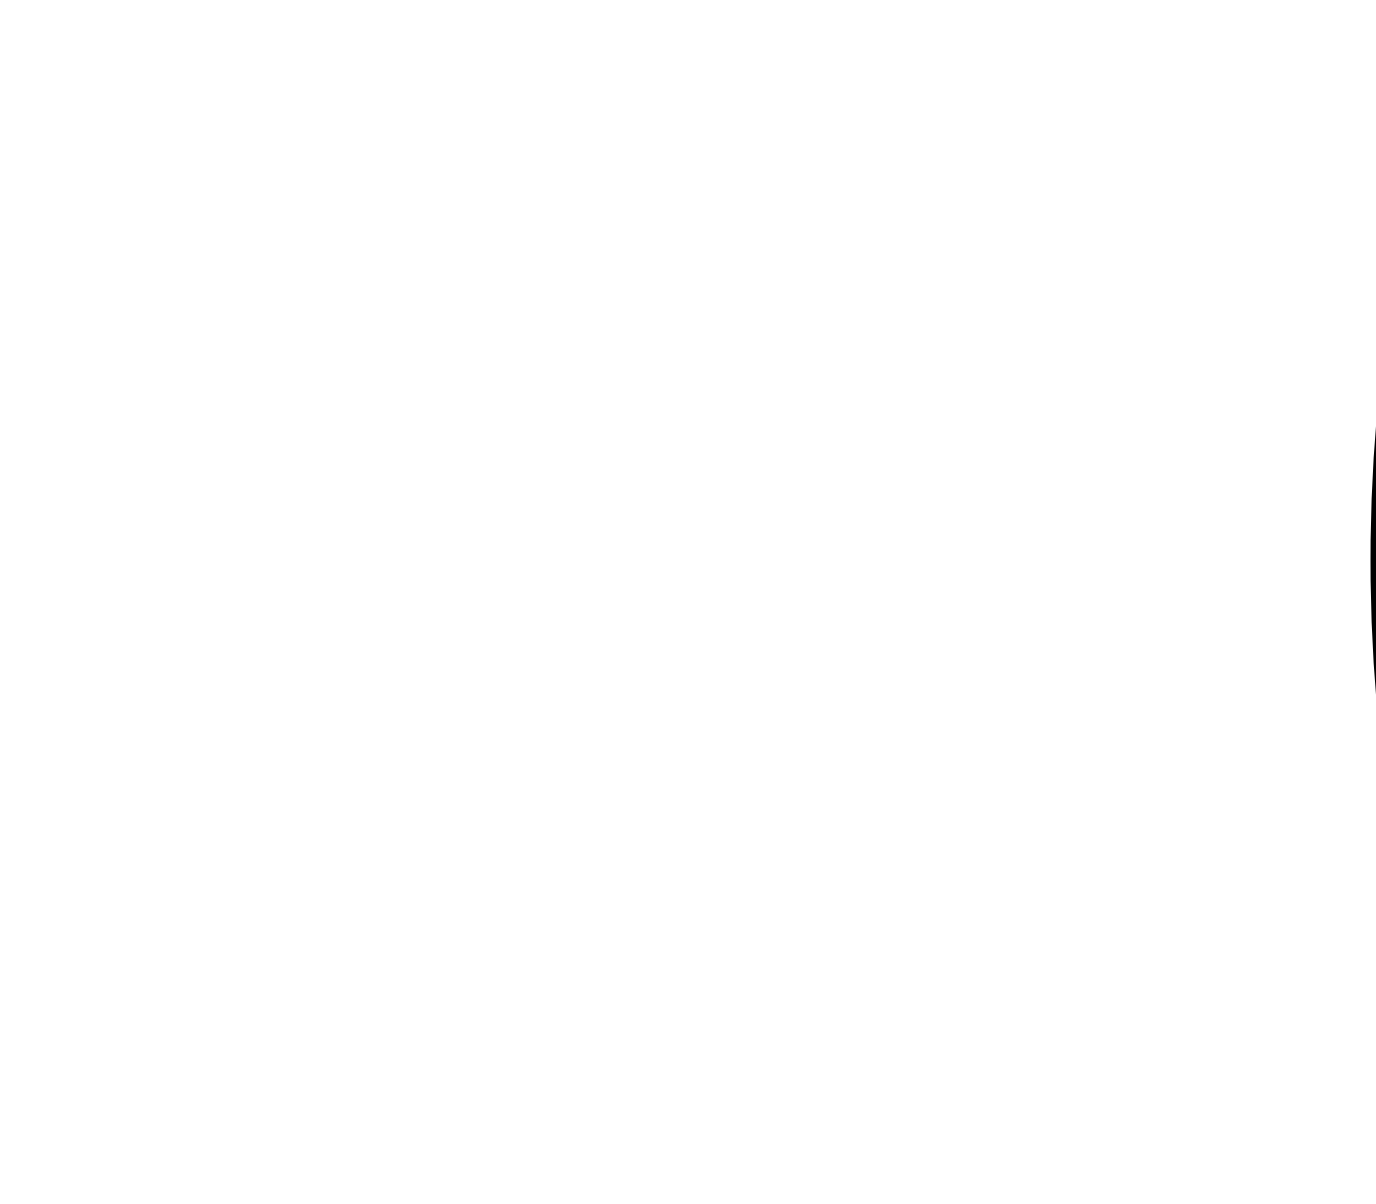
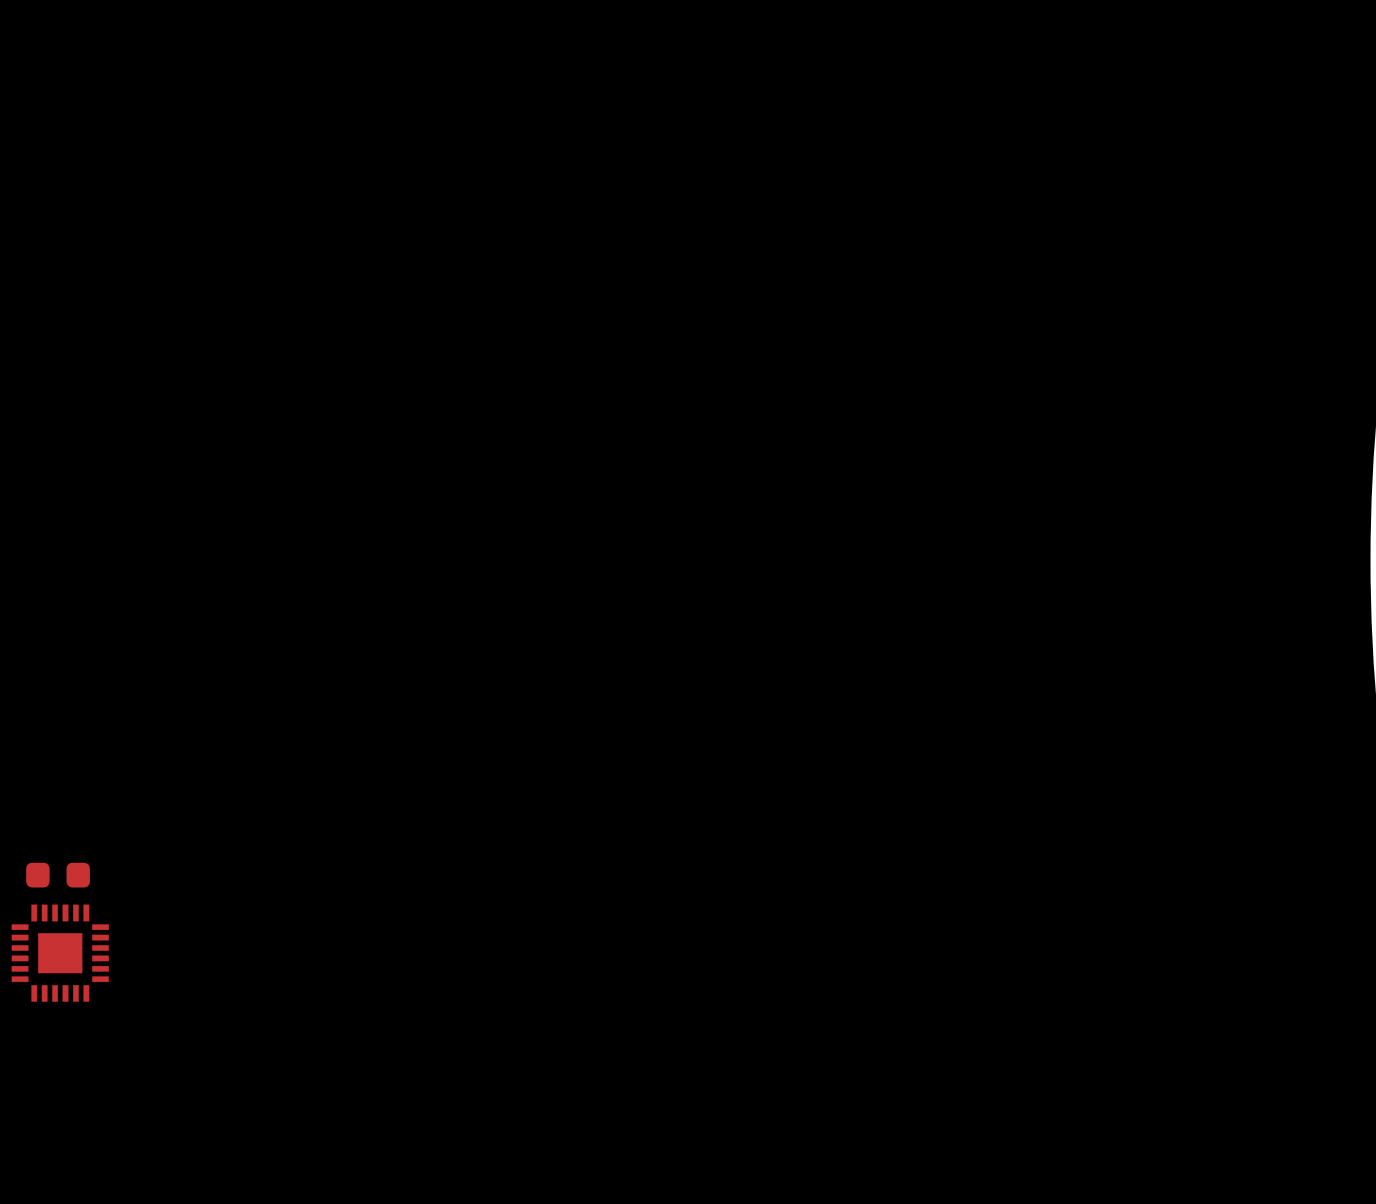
part: none -> (58, 875)
part: none -> (60, 953)

